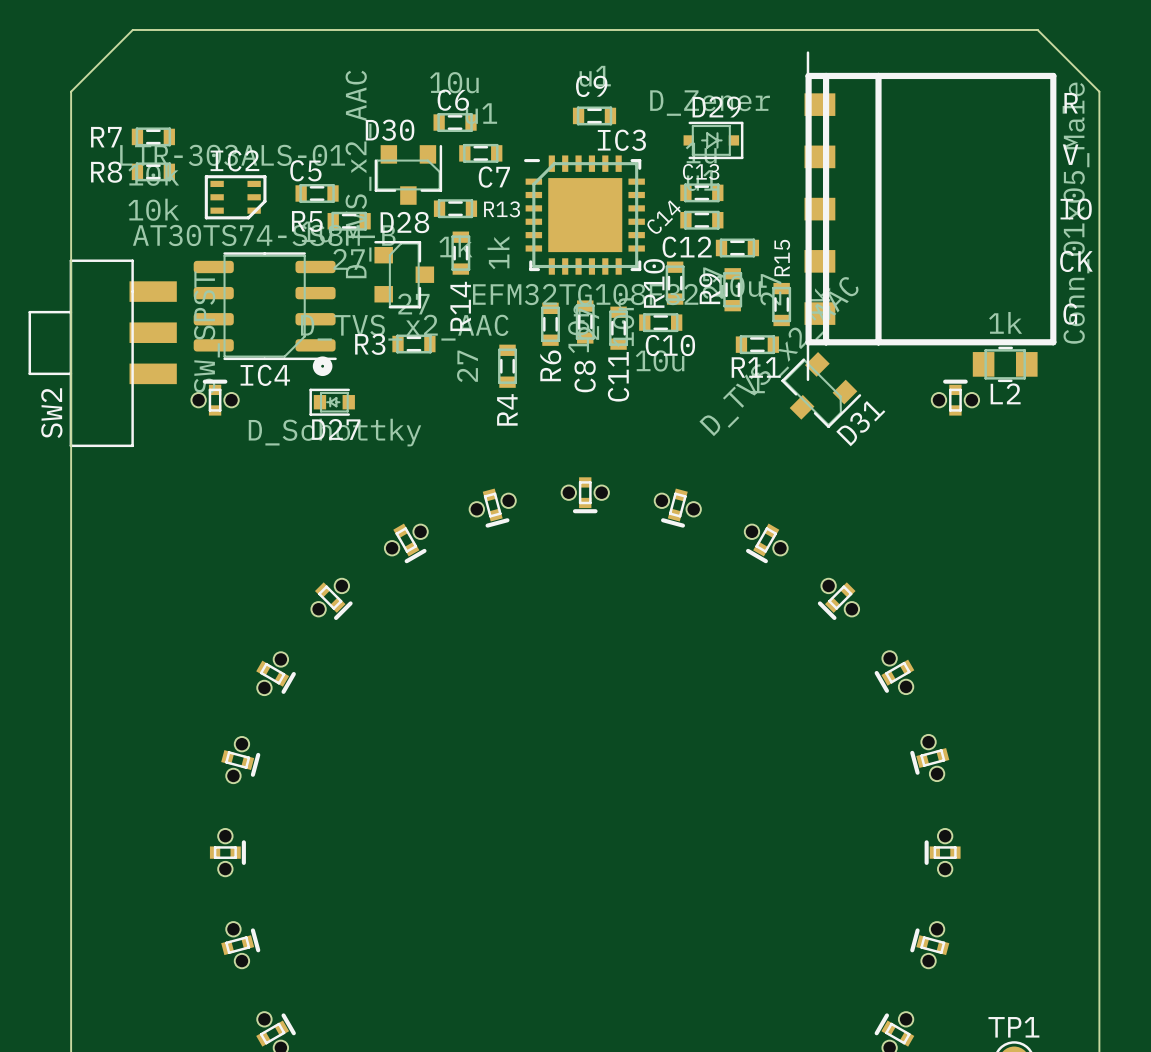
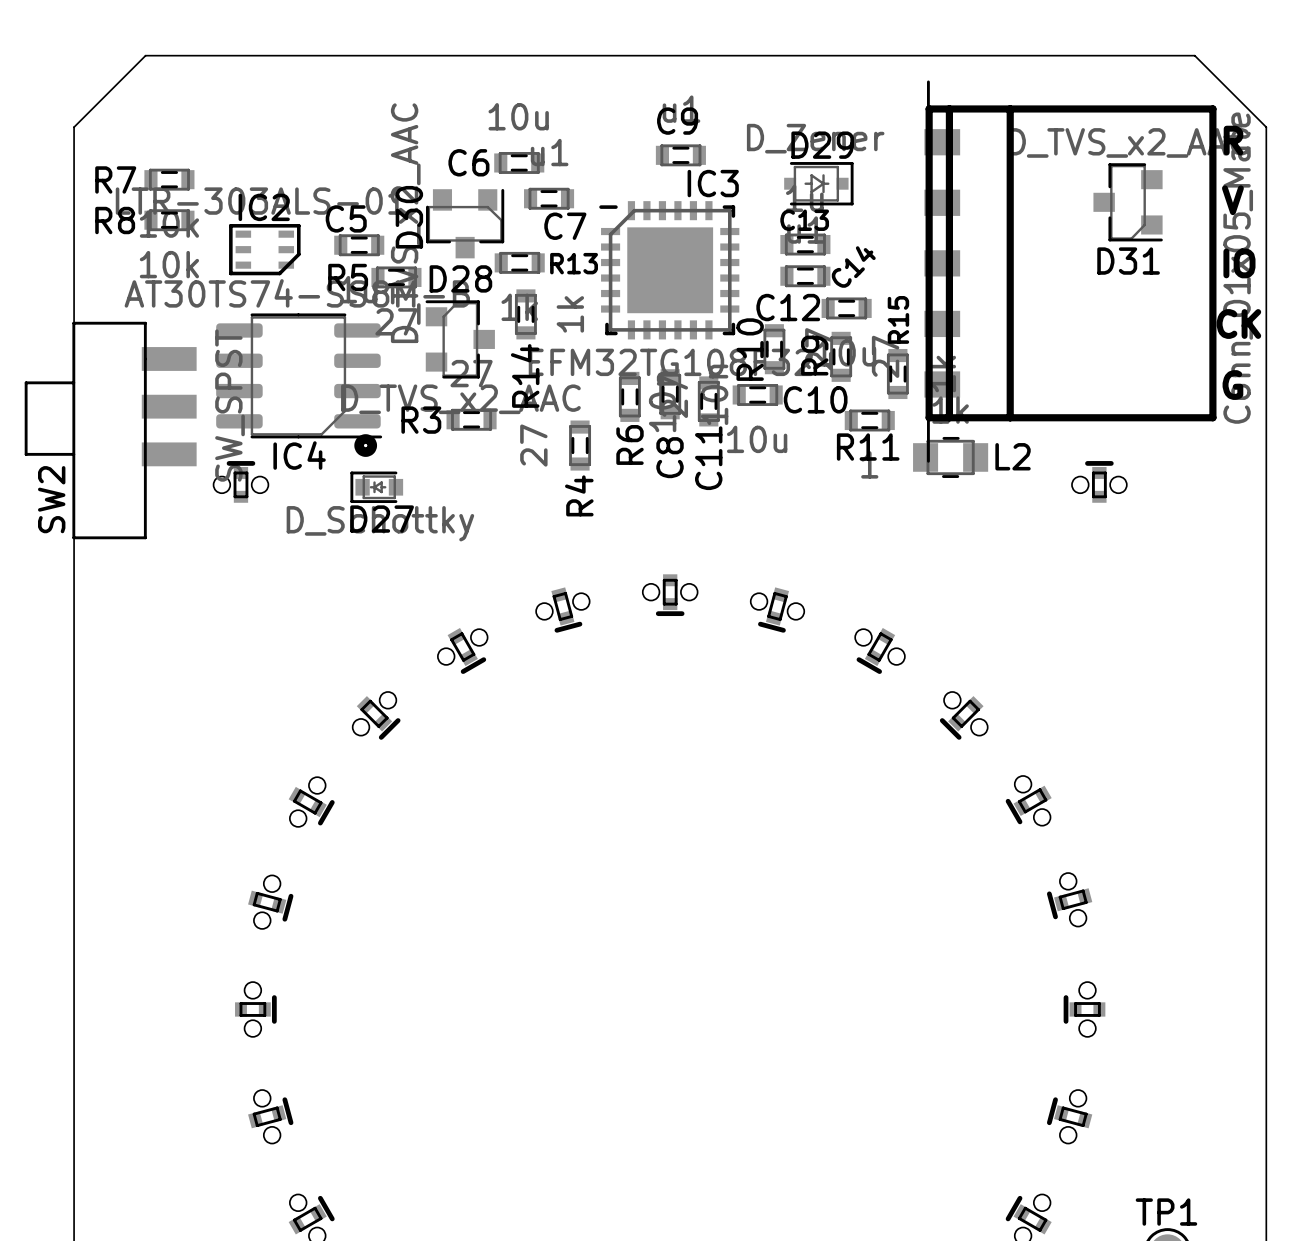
C6 name position: C6 (453, 100) -> C6 (468, 162)
D30 name rotation: 0° (390, 130) -> 90° counterclockwise (409, 217)
C14 name position: C14 (663, 217) -> C14 (853, 267)
C10 name position: C10 (670, 345) -> C10 (815, 399)
L2 position: (1005, 364) -> (950, 457)
D31 rotation: 0° (821, 390) -> 45° clockwise (1128, 202)
D31 position: (821, 390) -> (1128, 202)
L2 name position: L2 (1005, 393) -> L2 (1013, 456)

